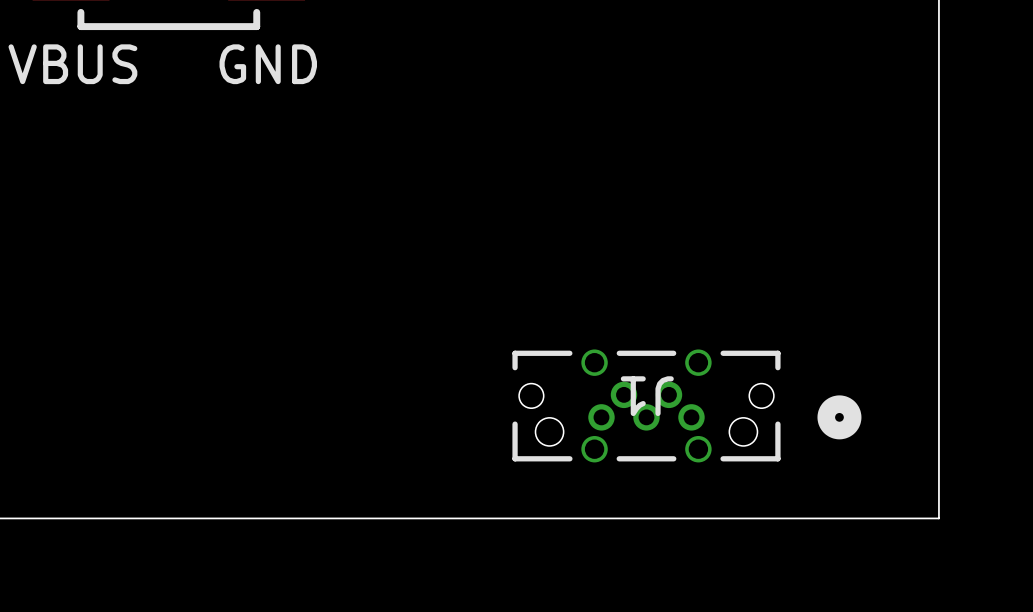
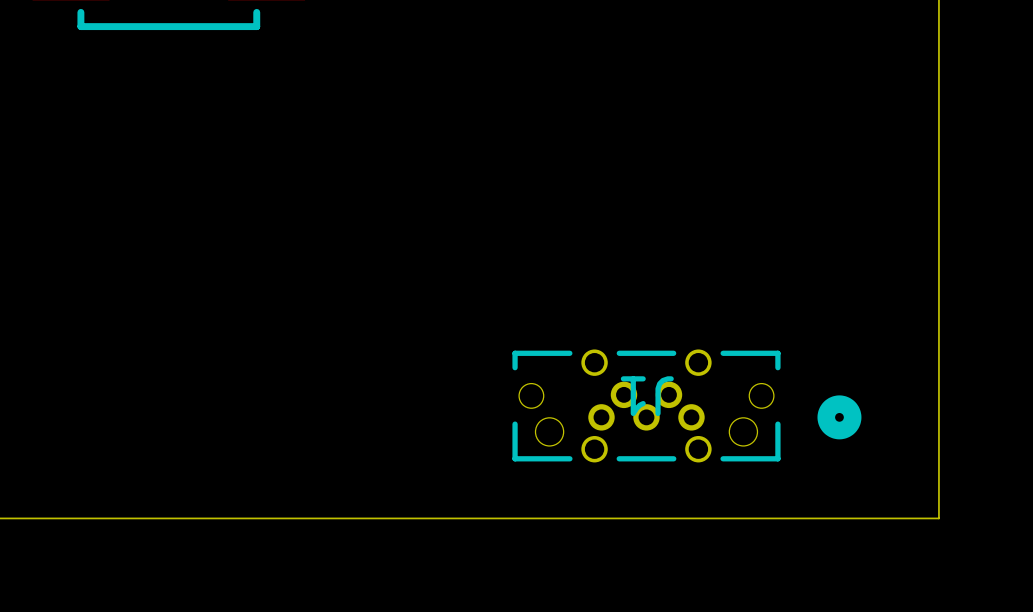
text: VBUS (72, 64) -> none
text: GND (268, 64) -> none

